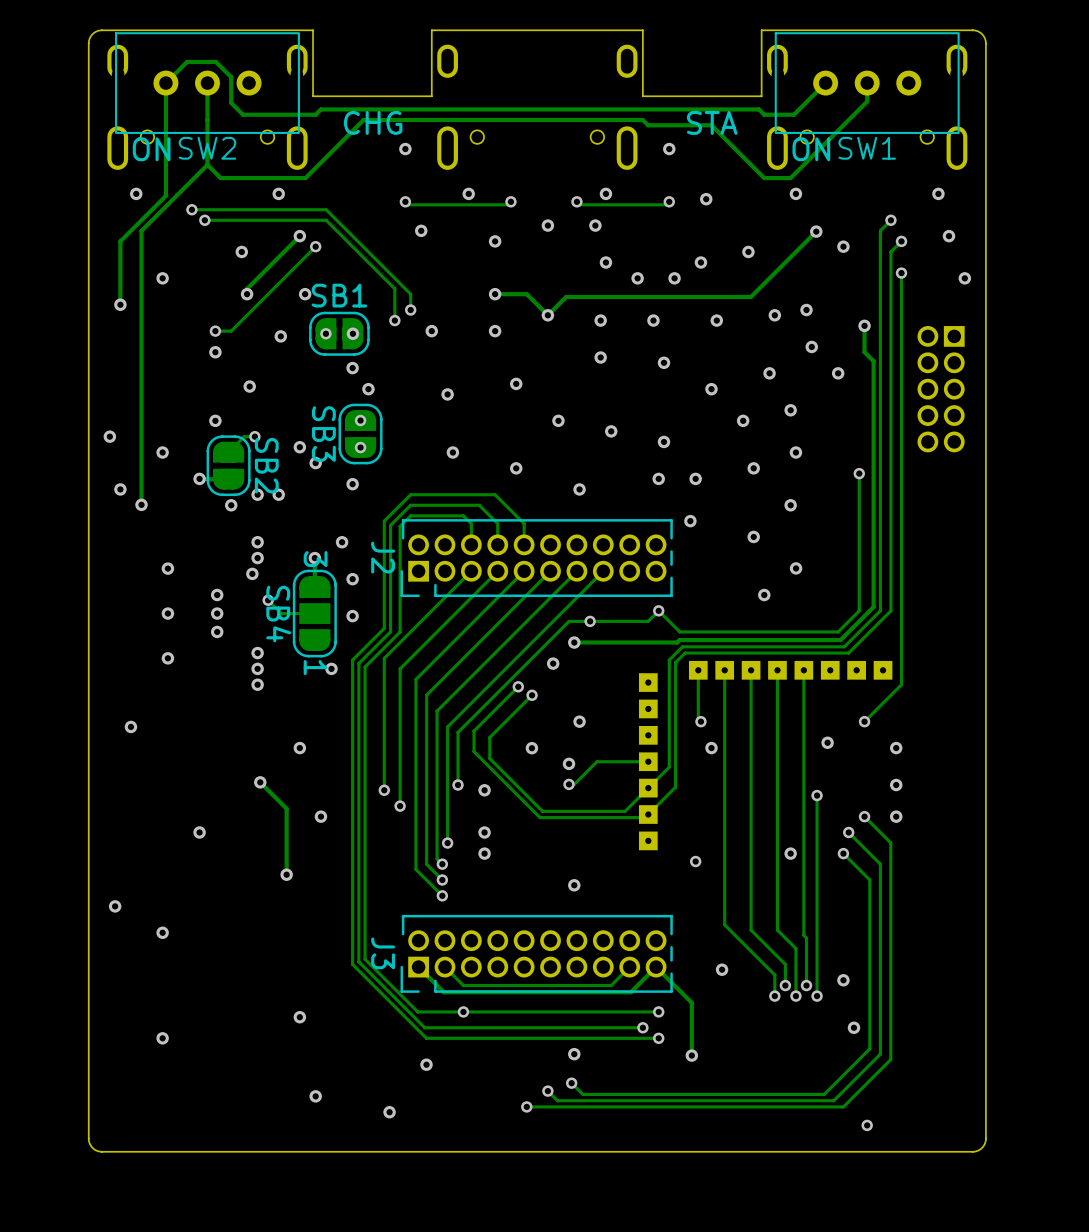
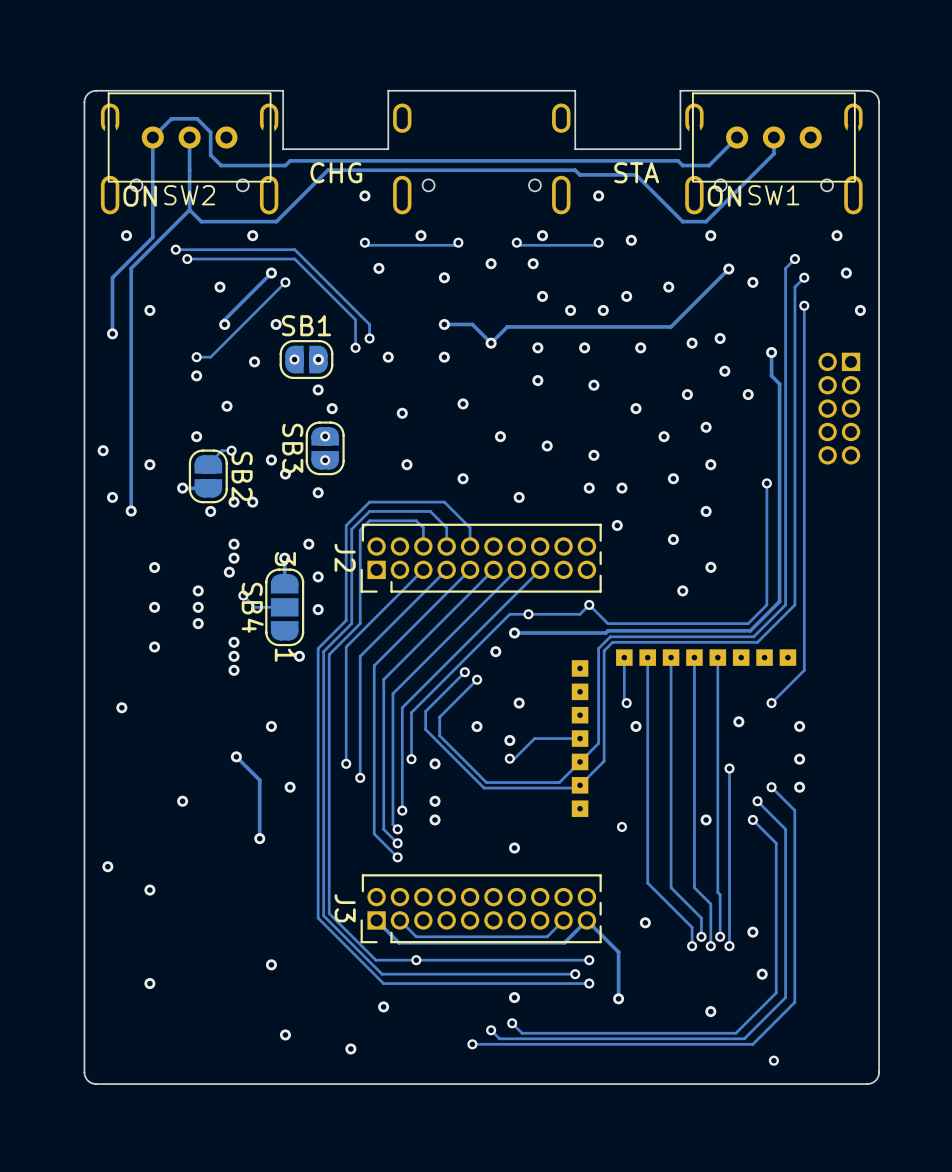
via: none -> (710, 1011)

